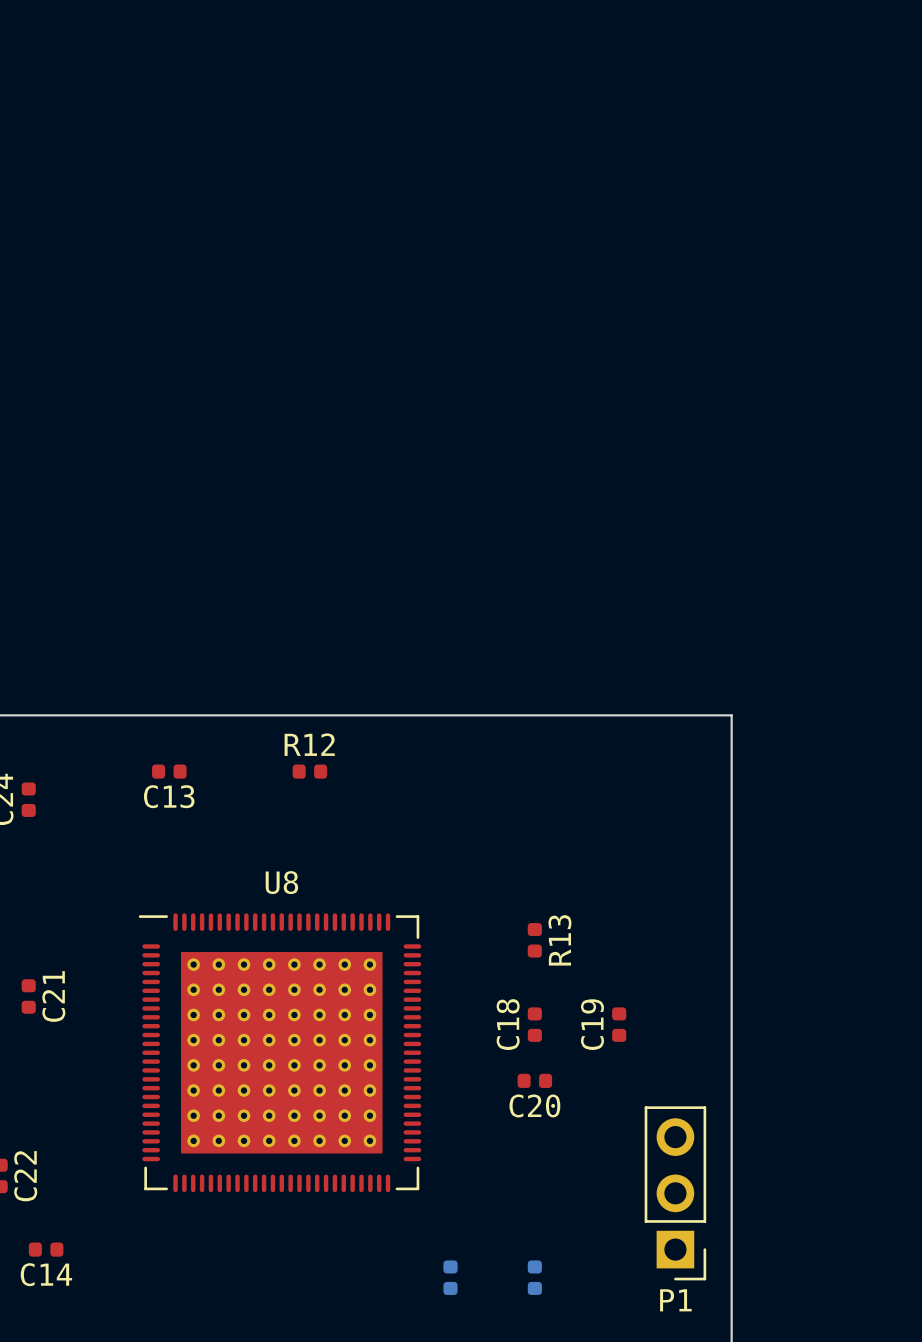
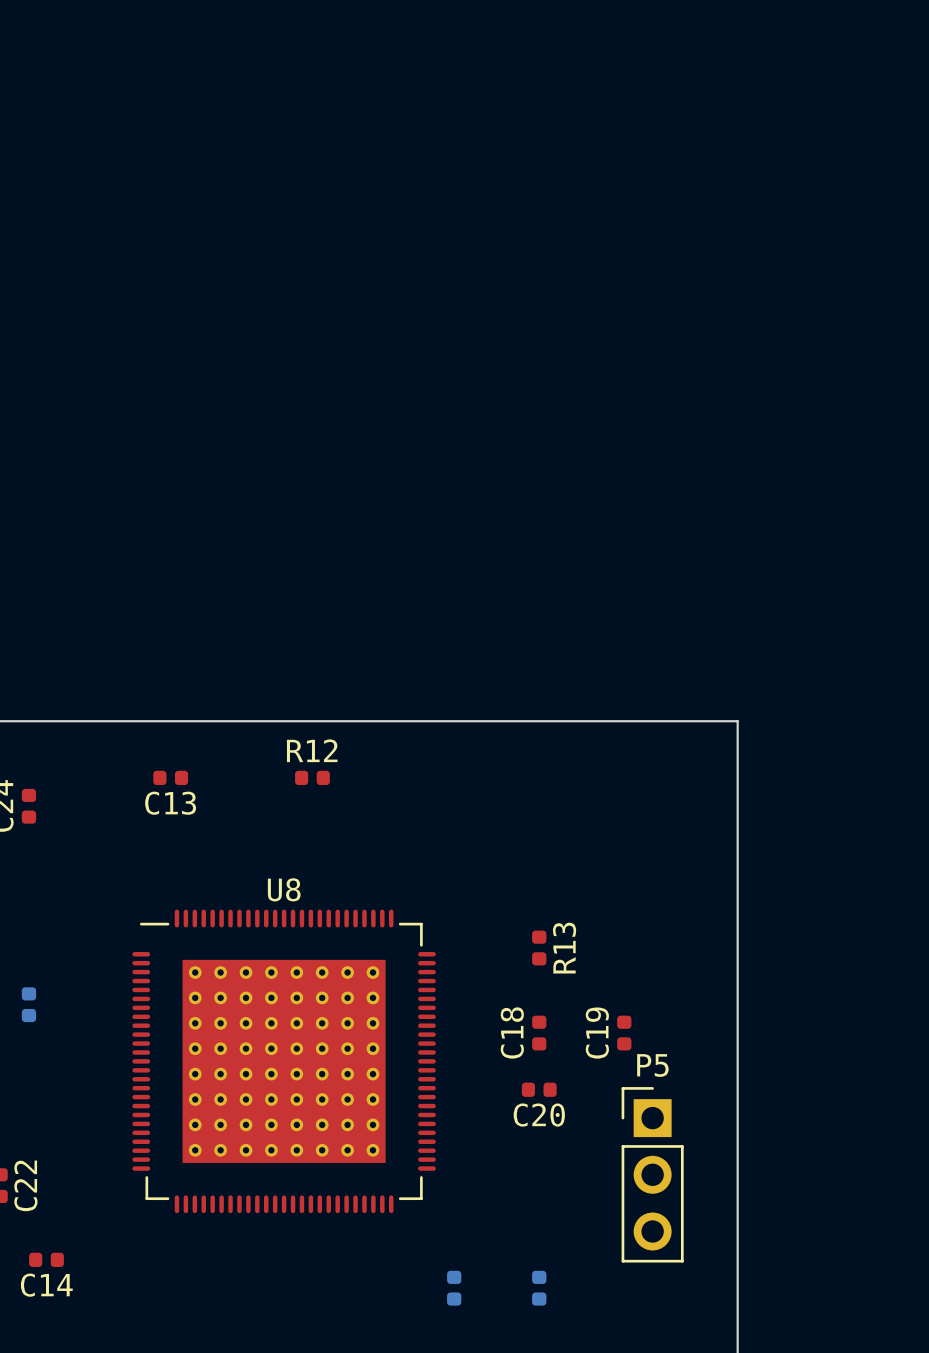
U8 footprint: [138, 913, 422, 1193] -> [132, 909, 436, 1214]
C21 side: top (28, 996) -> bottom (28, 1004)
P5: none -> (652, 1174)
P1: (675, 1193) -> none

